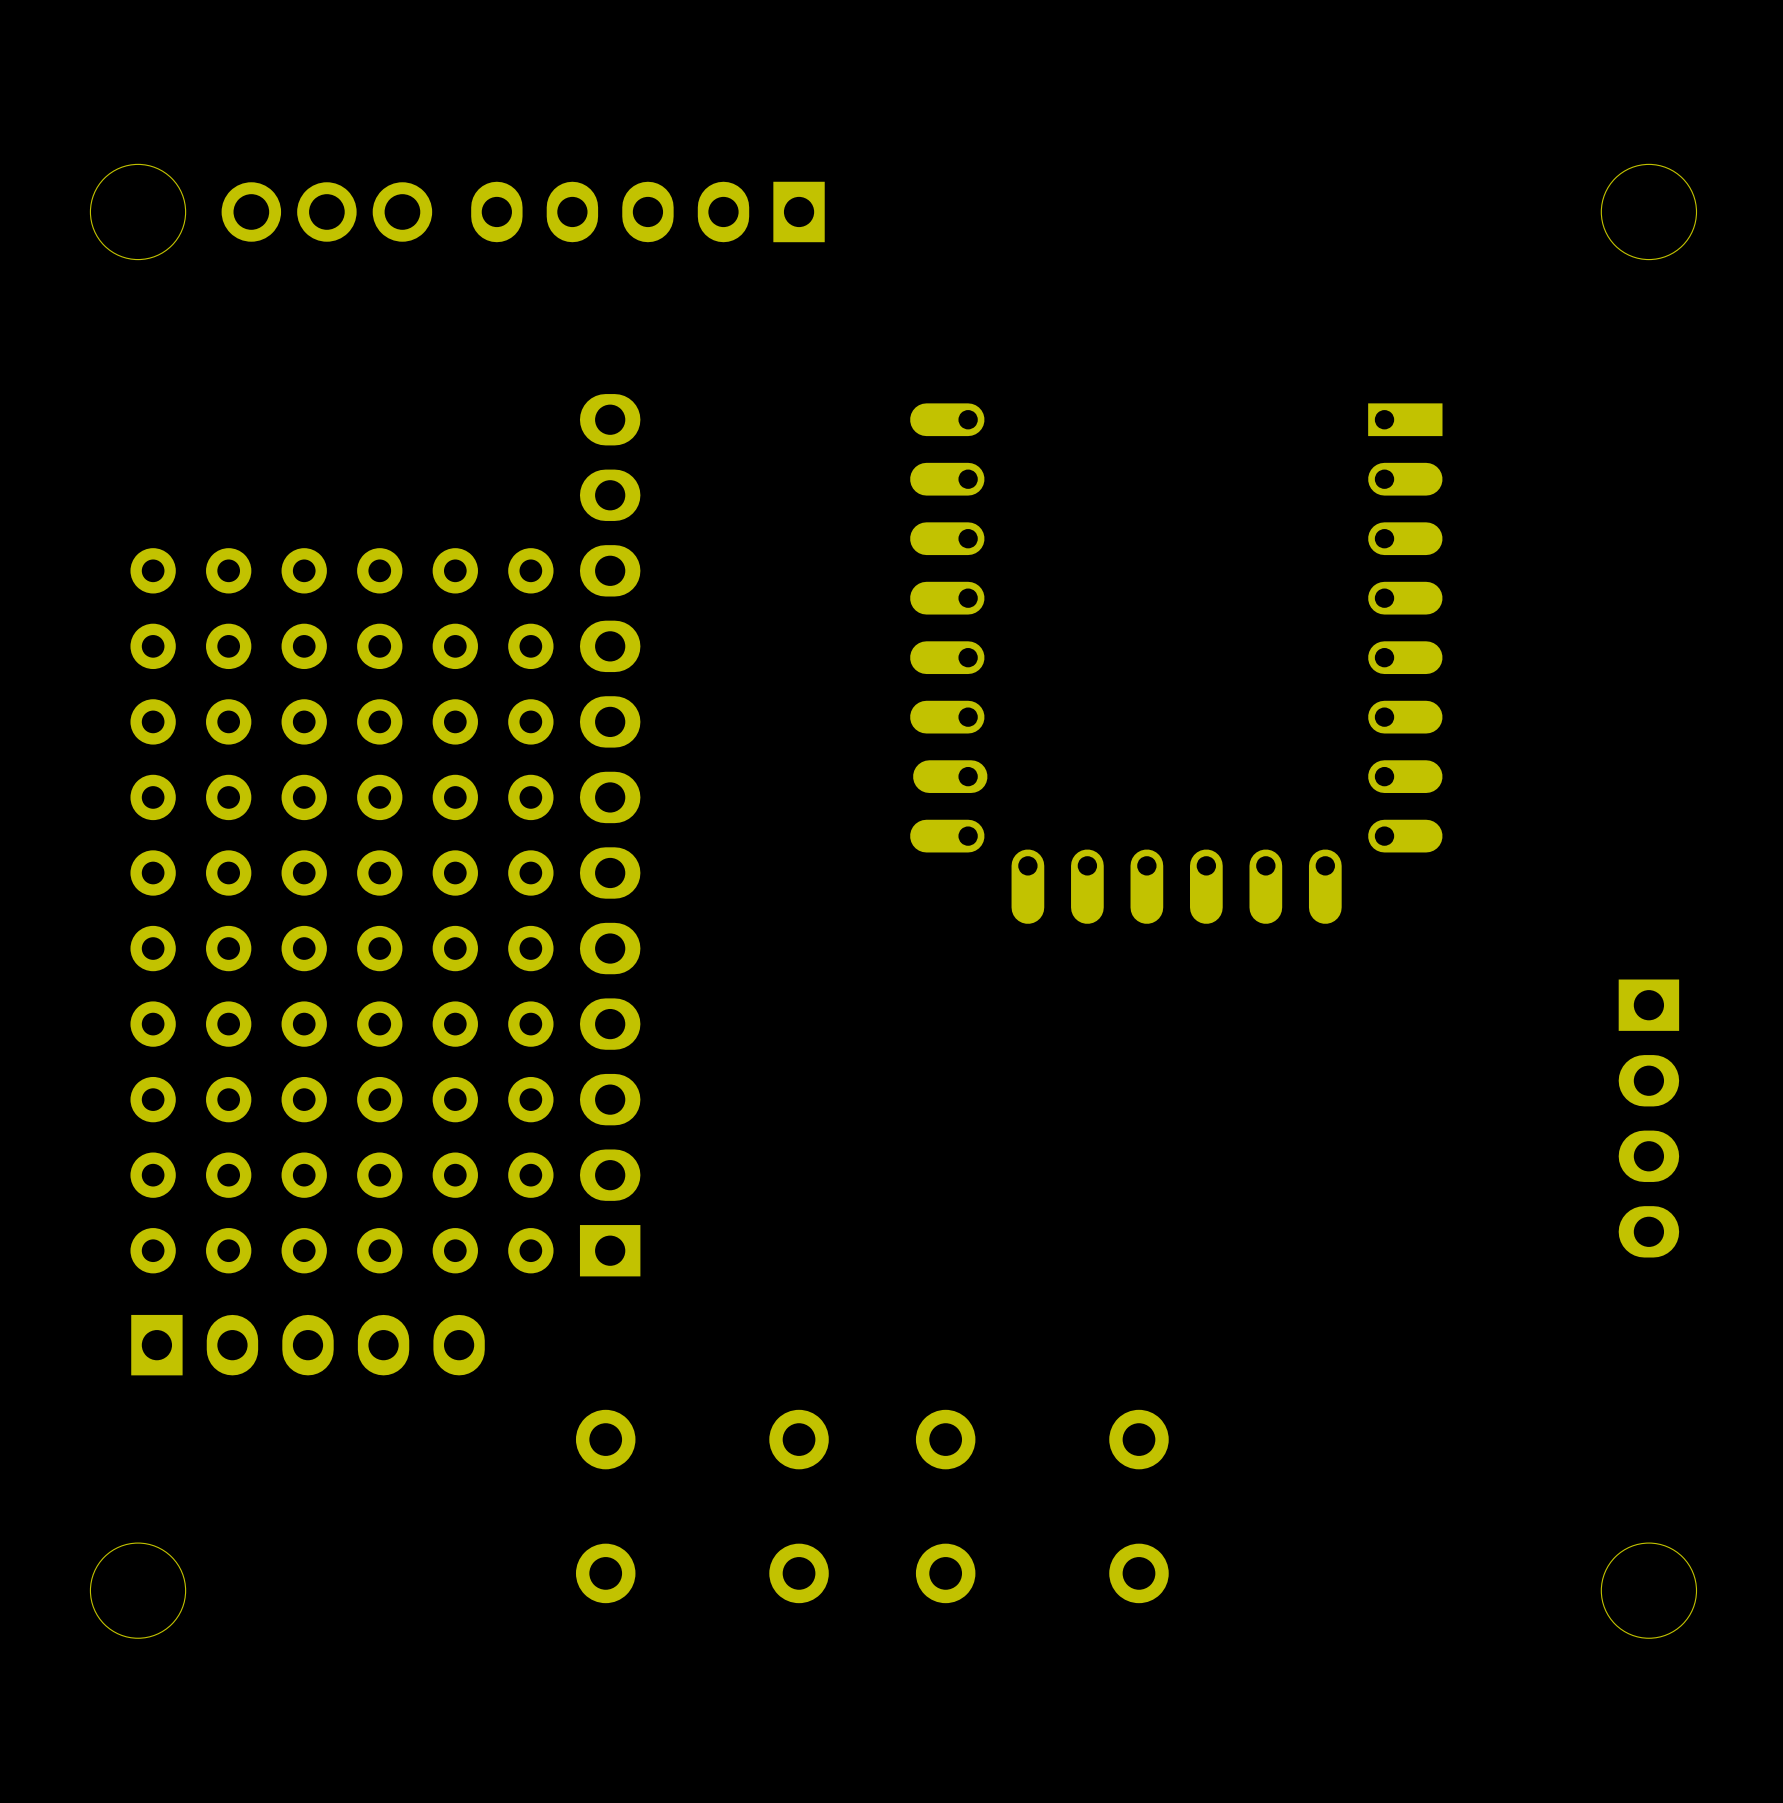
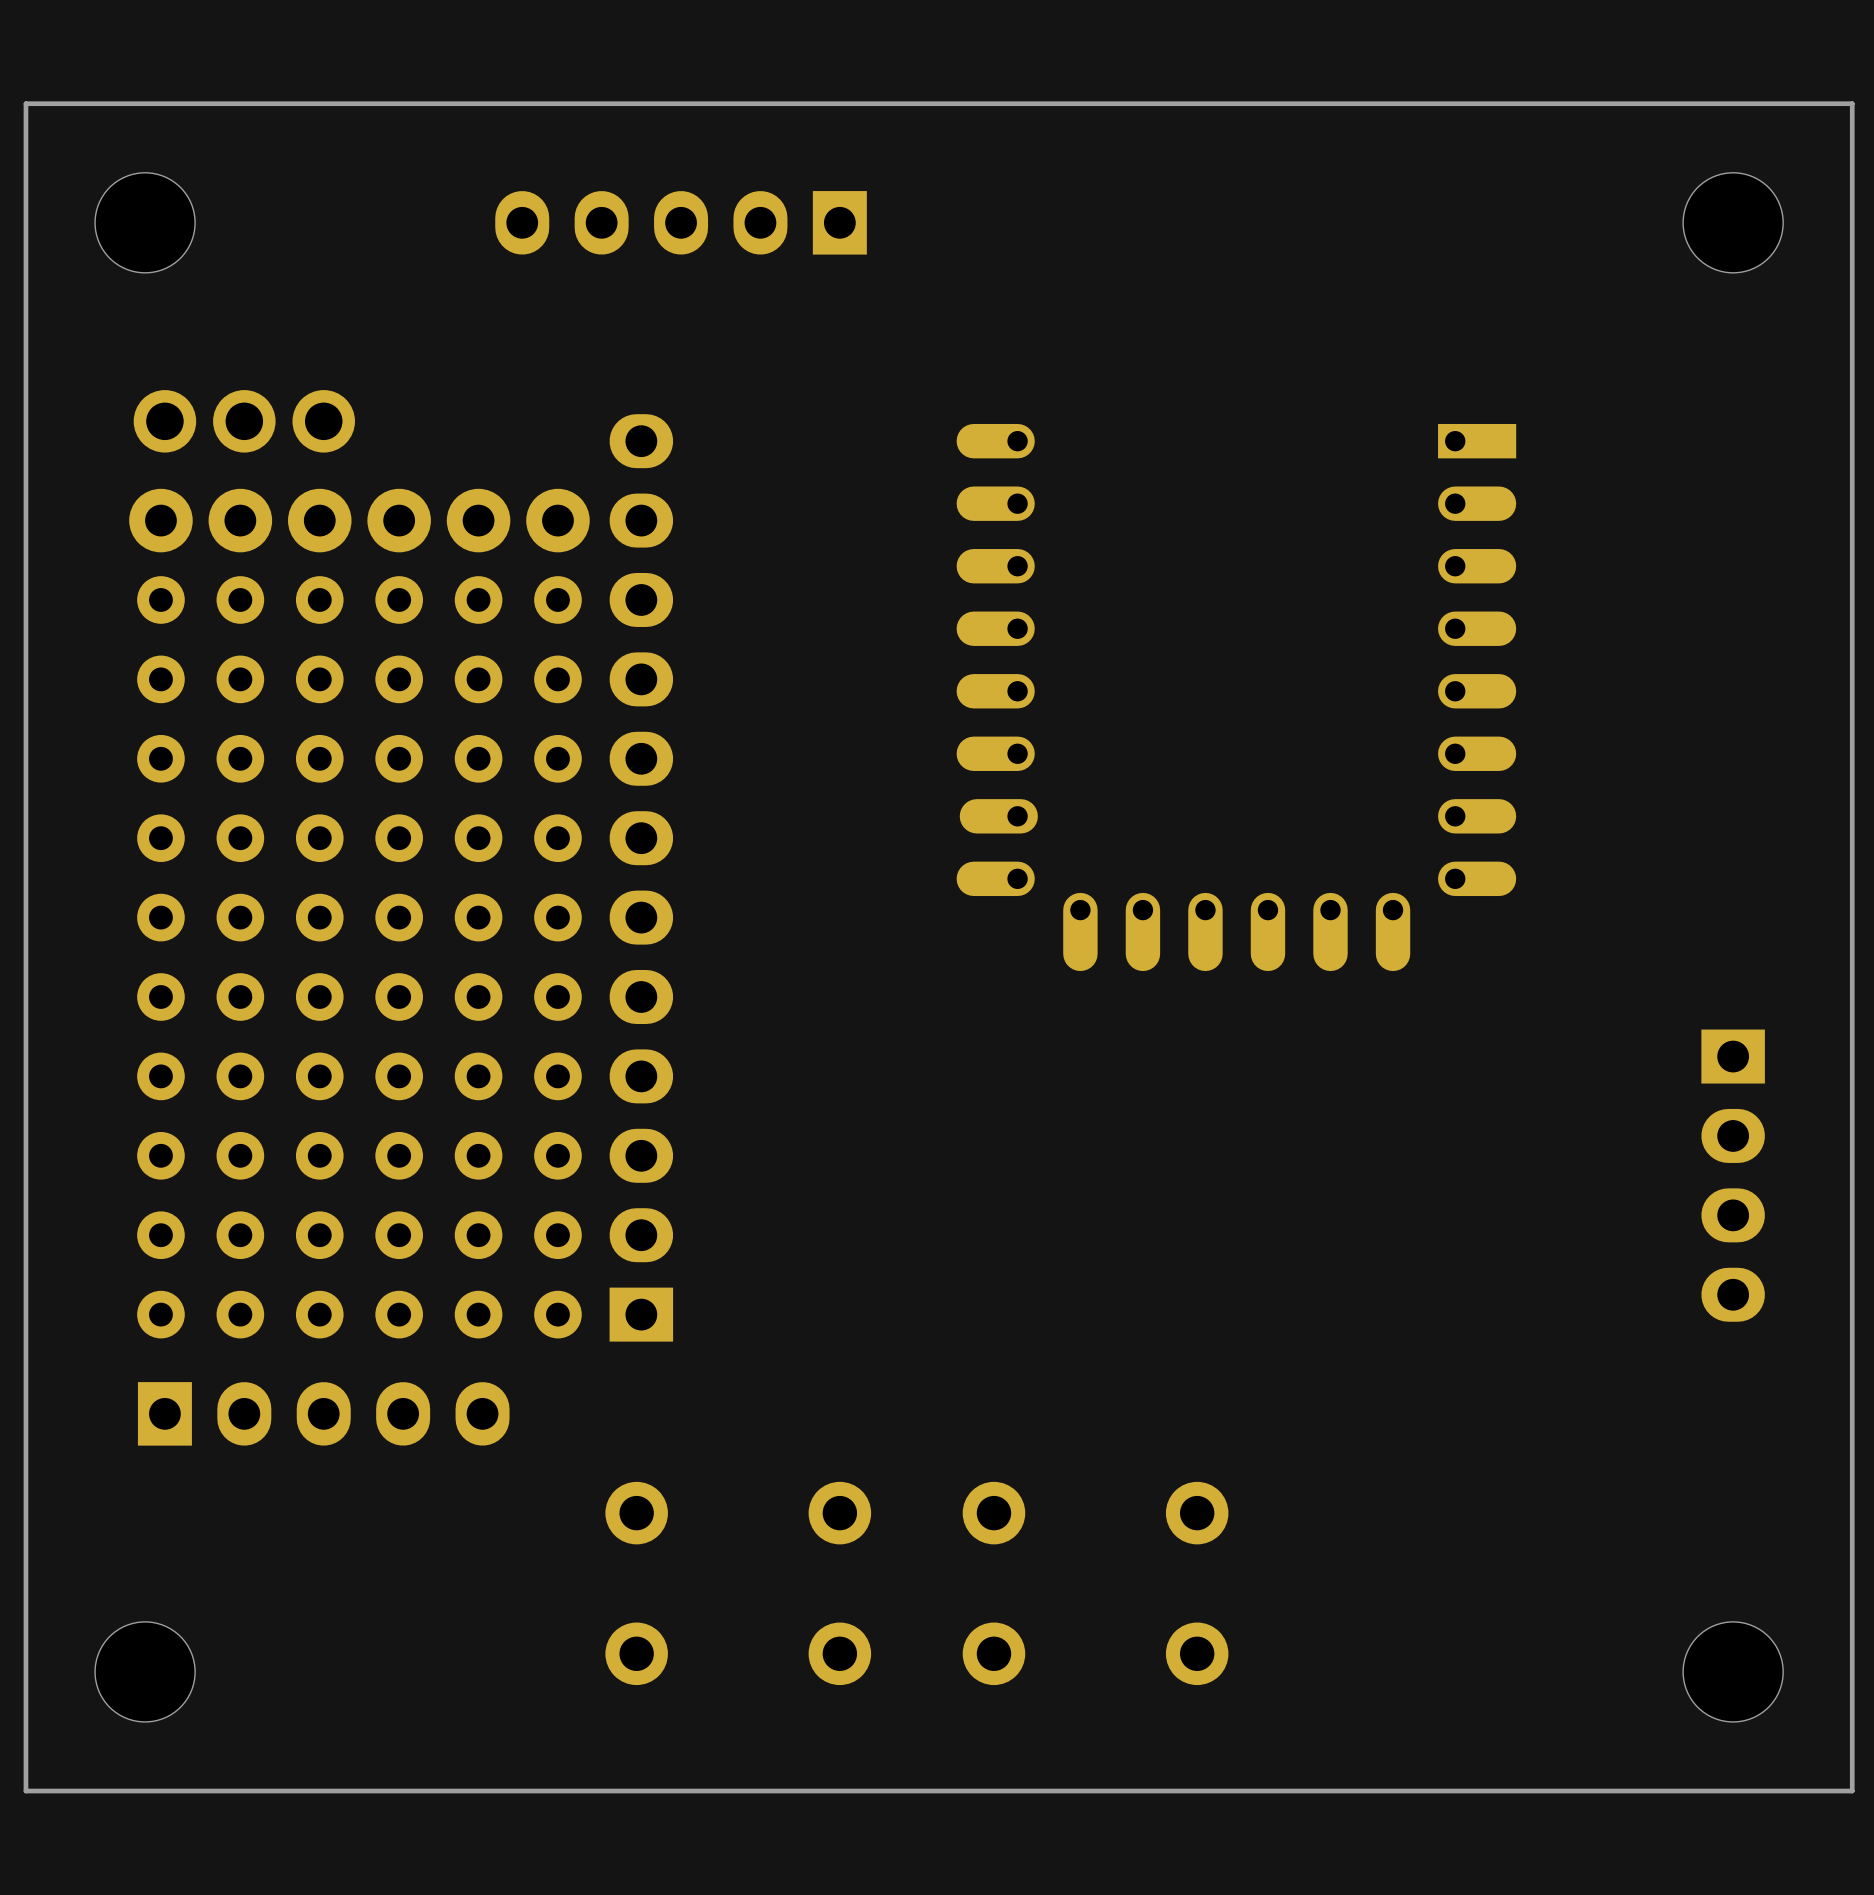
board edge: none -> (1852, 103) (1852, 1791) (25, 1791) (25, 103) (1852, 103)
part position: (326, 211) -> (244, 421)
part: none -> (359, 520)

